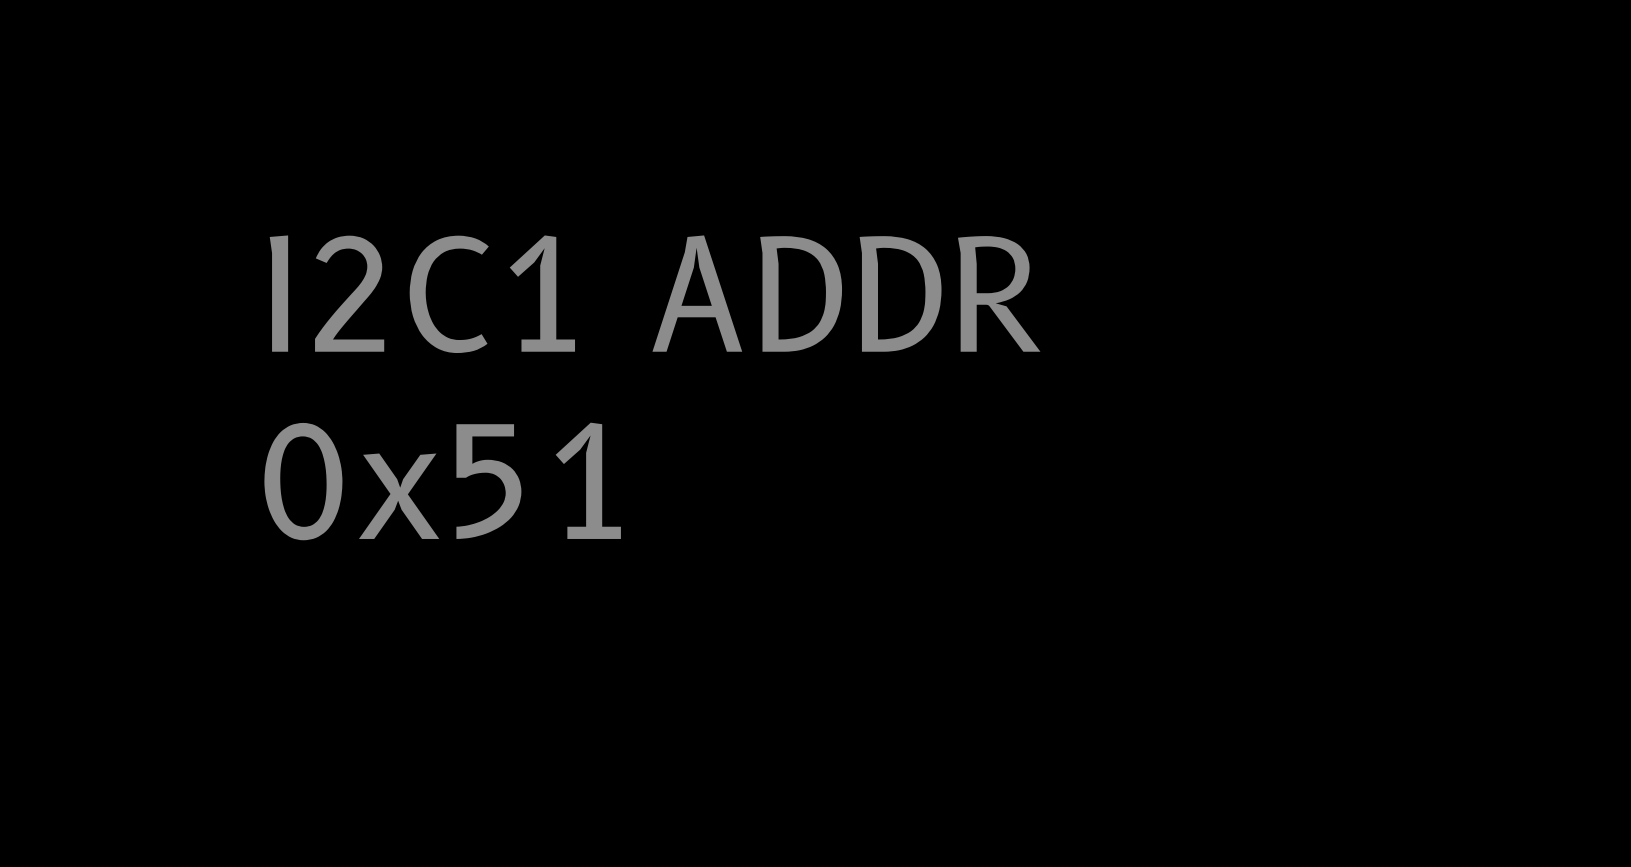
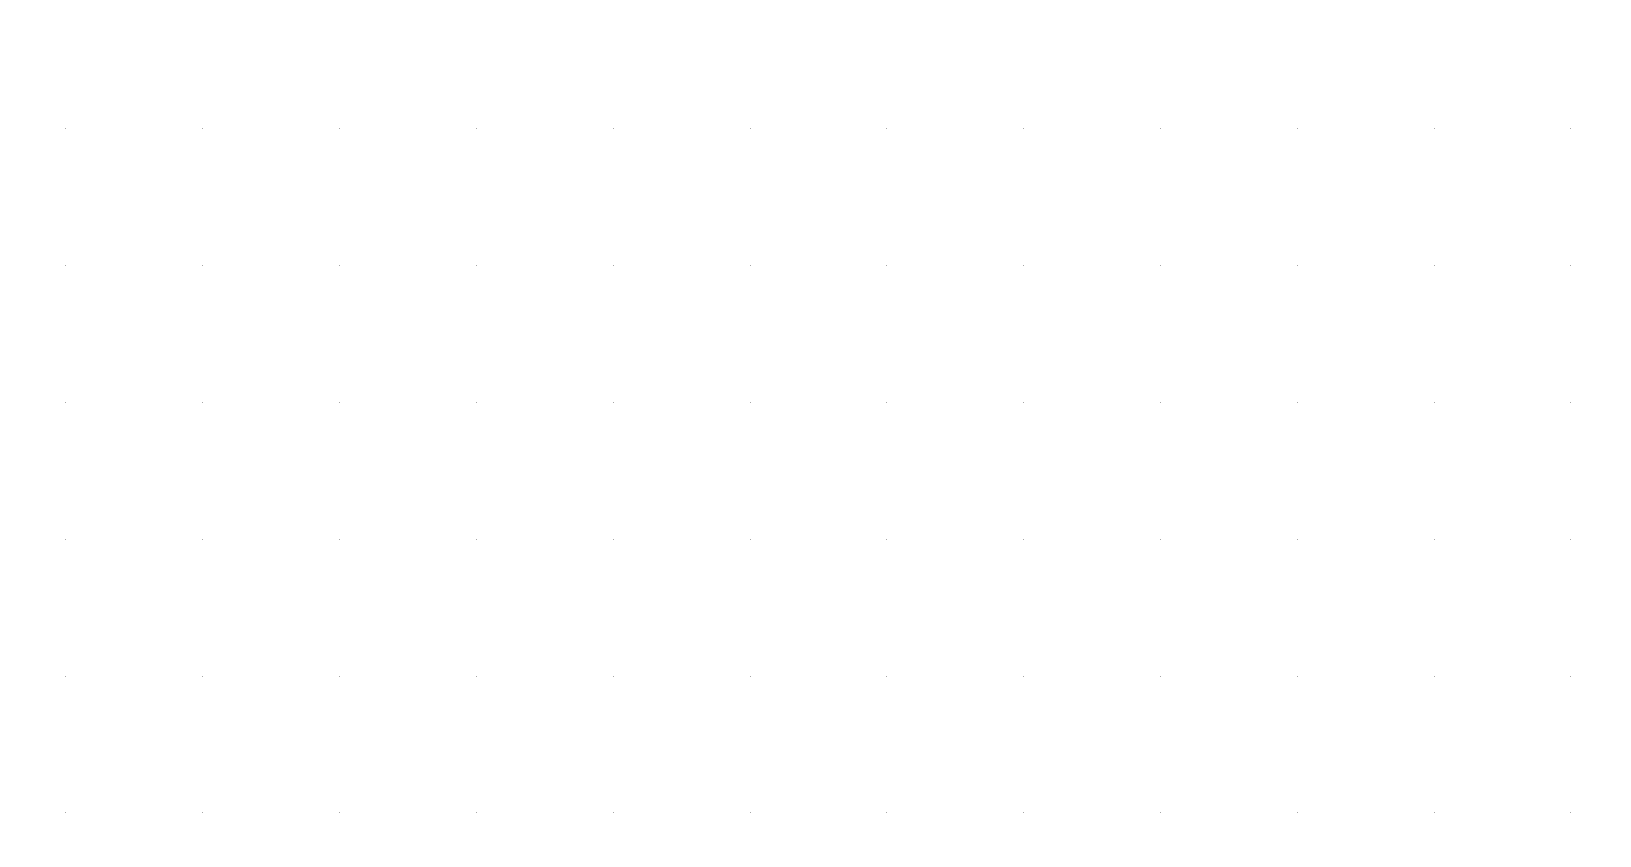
text: I2C1 ADDR (655, 294) -> none
text: 0x51 (442, 481) -> none

